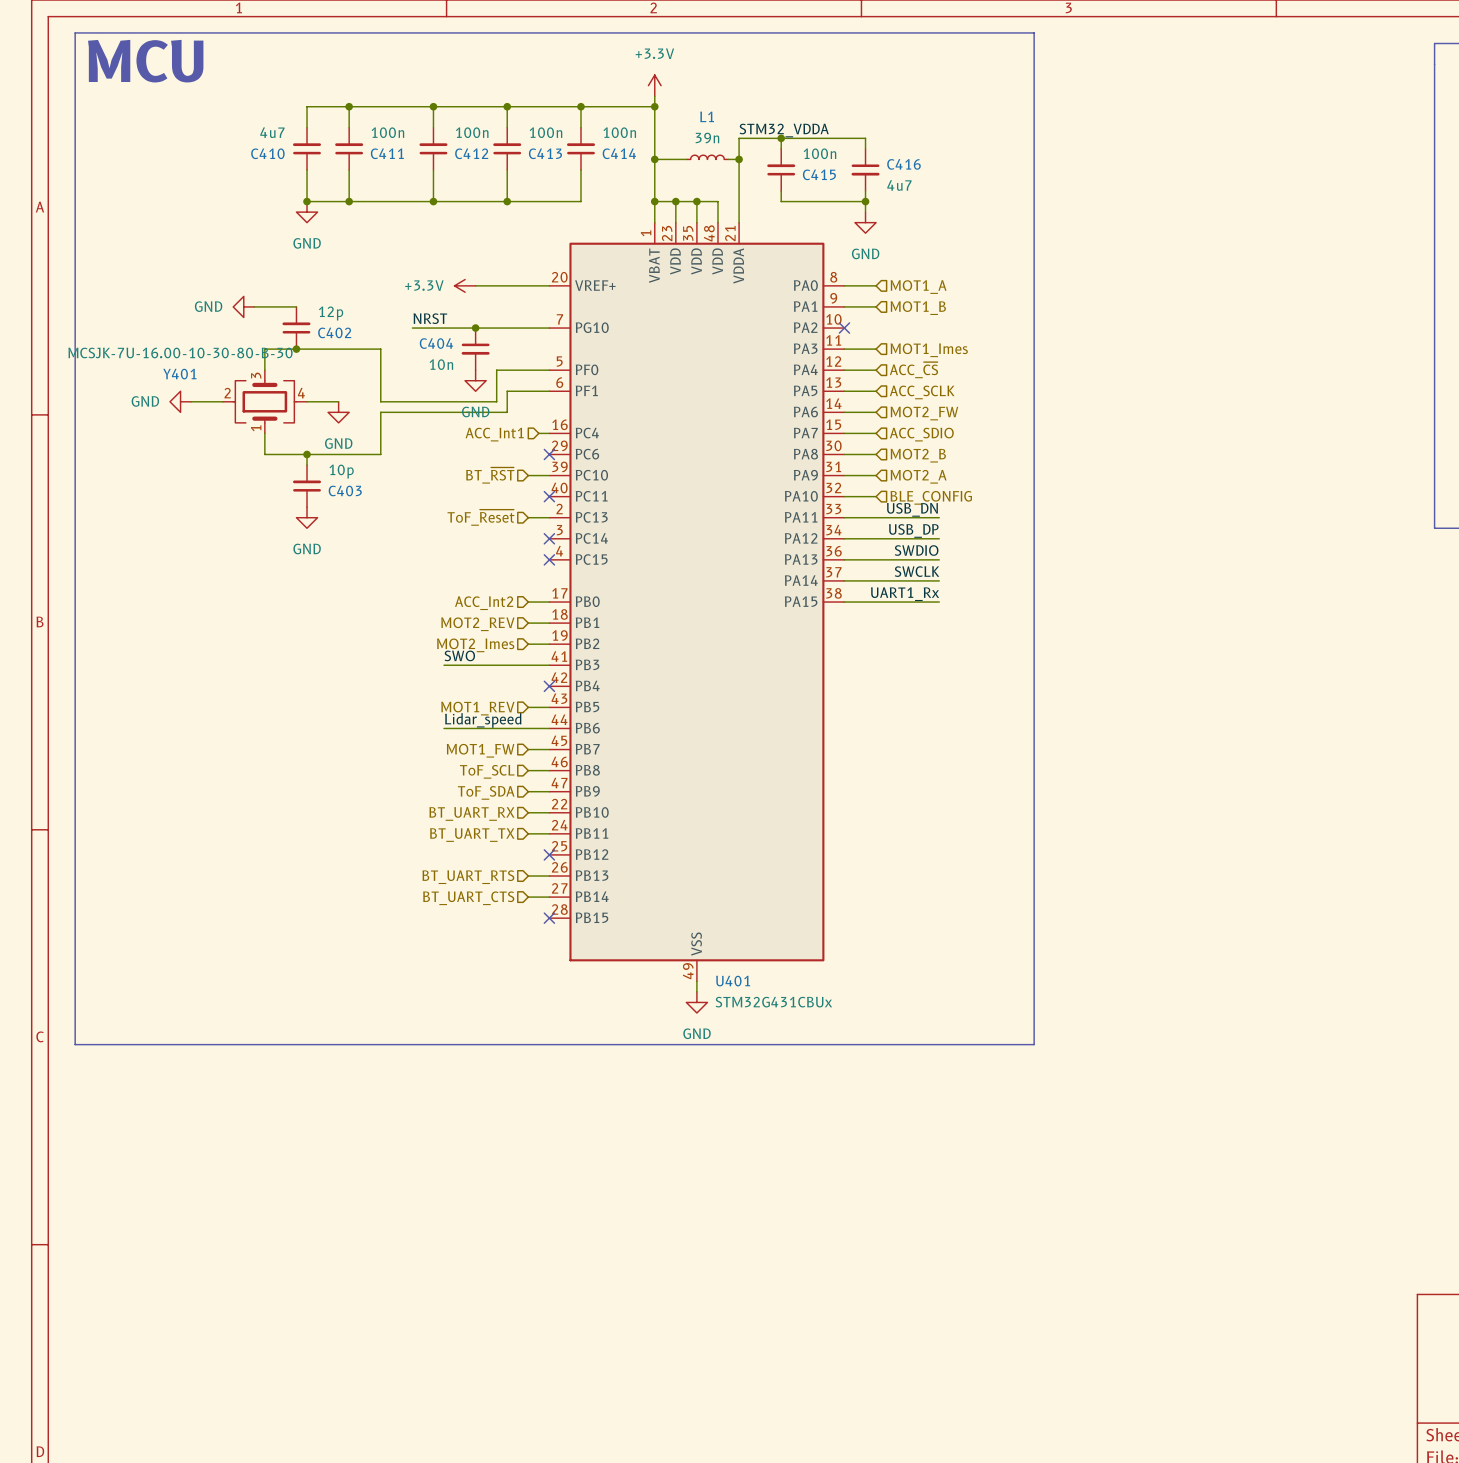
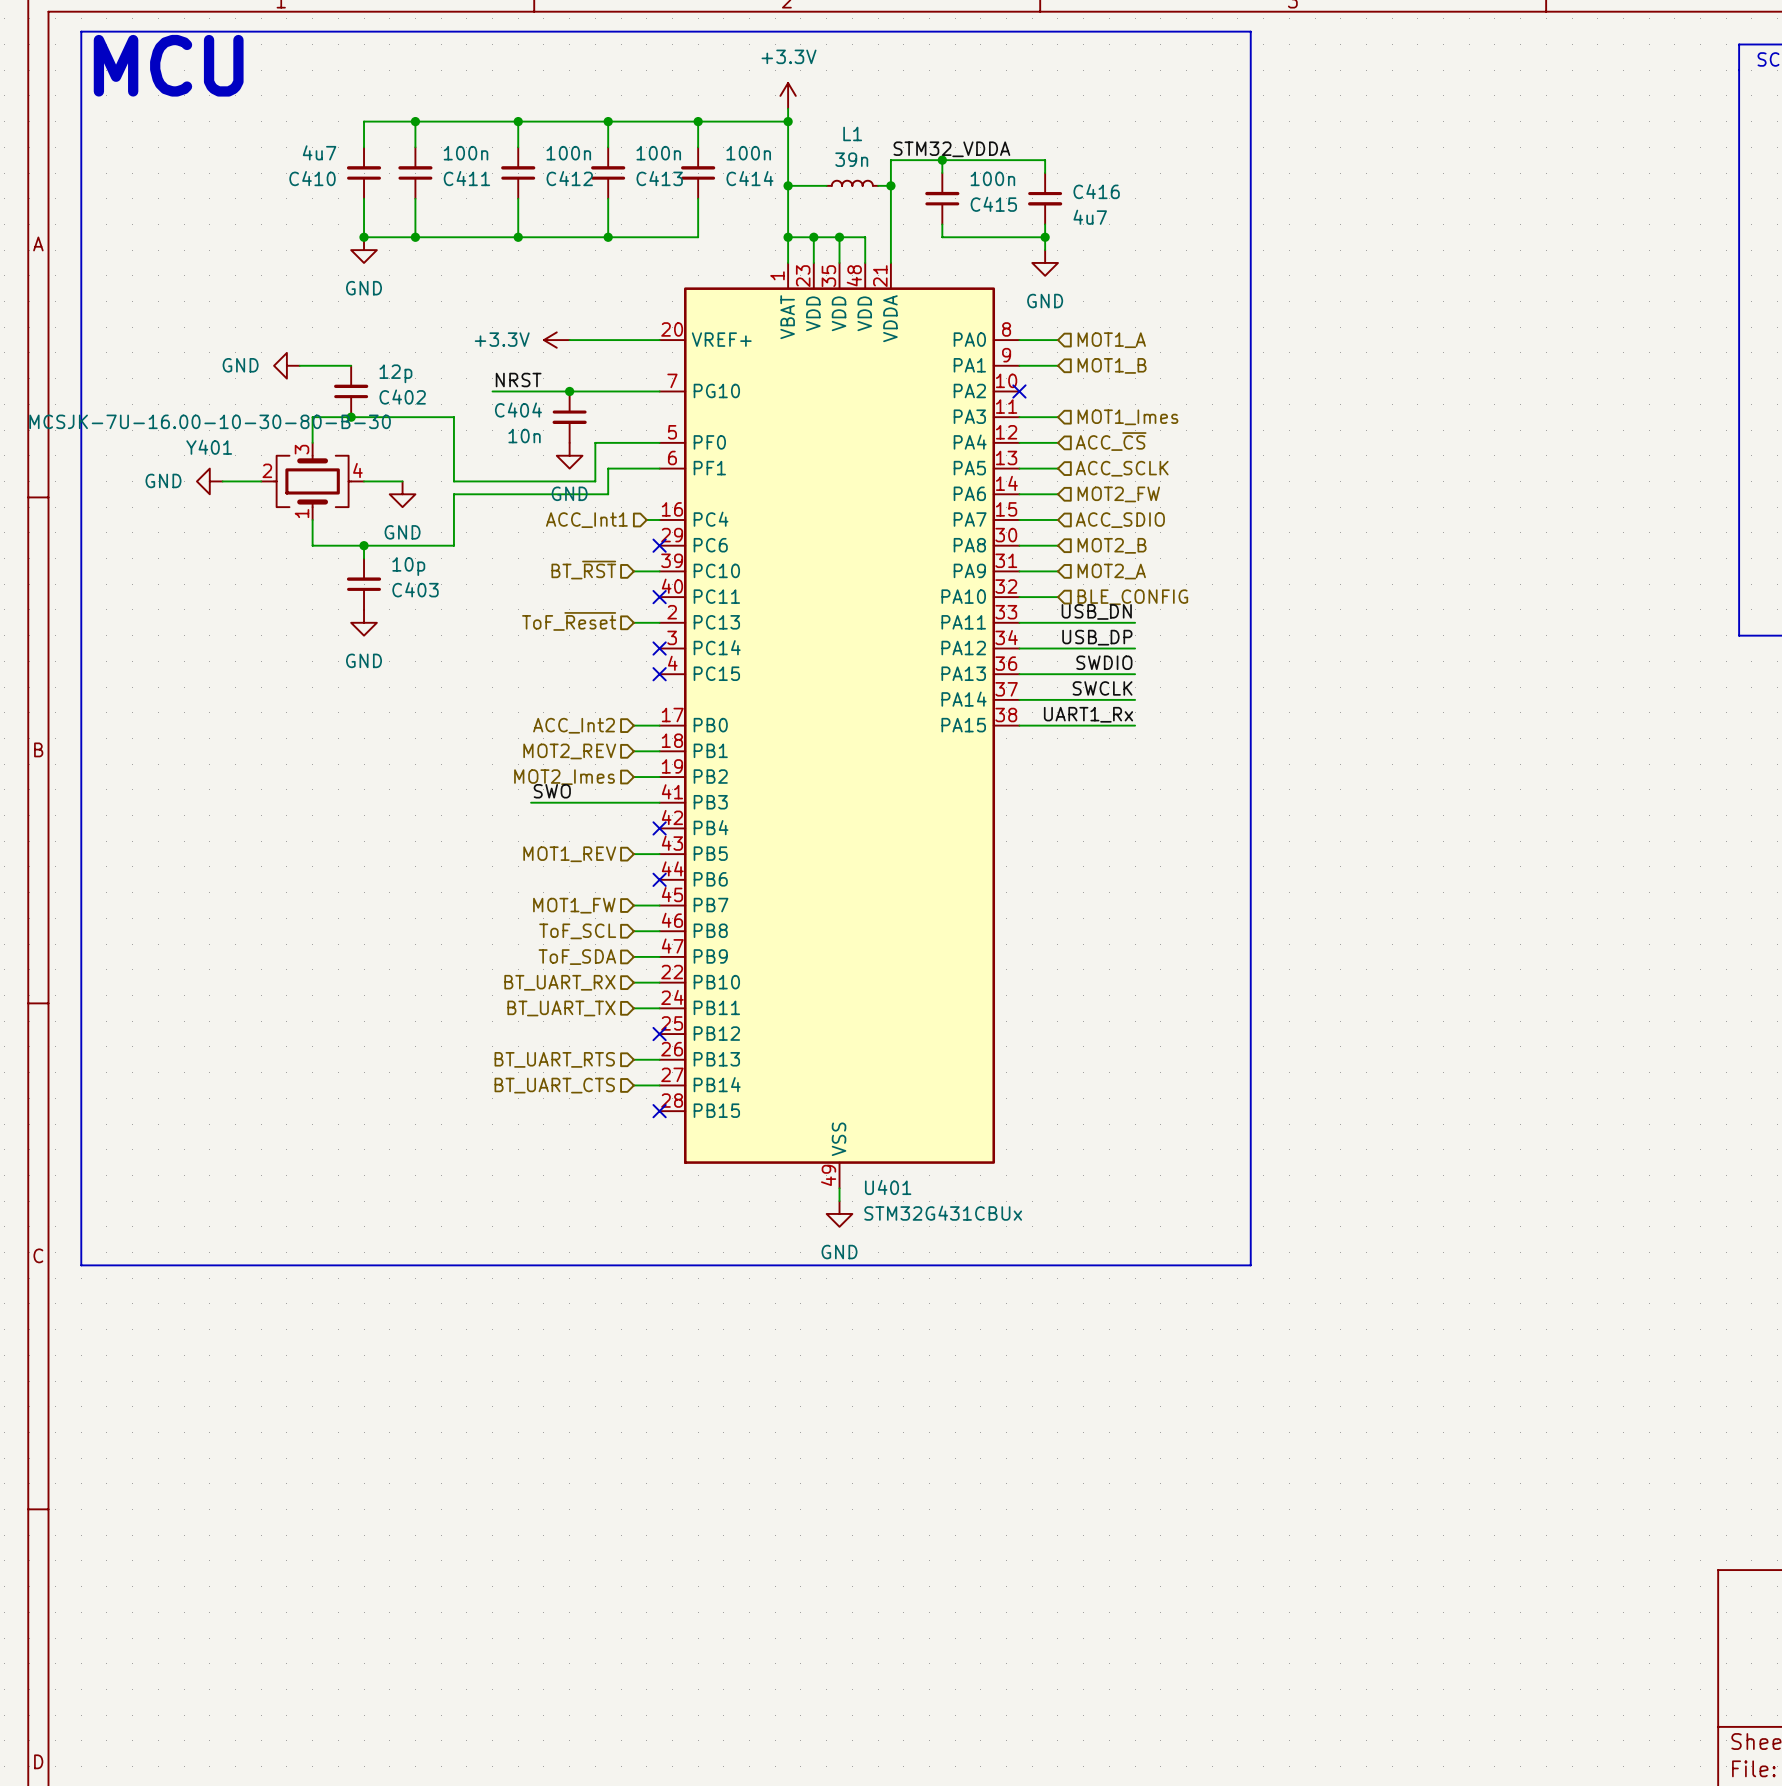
label: Lidar_speed (483, 720) -> none
wire: (444, 728) (549, 728) -> none
no-connect mark: none -> (659, 879)

